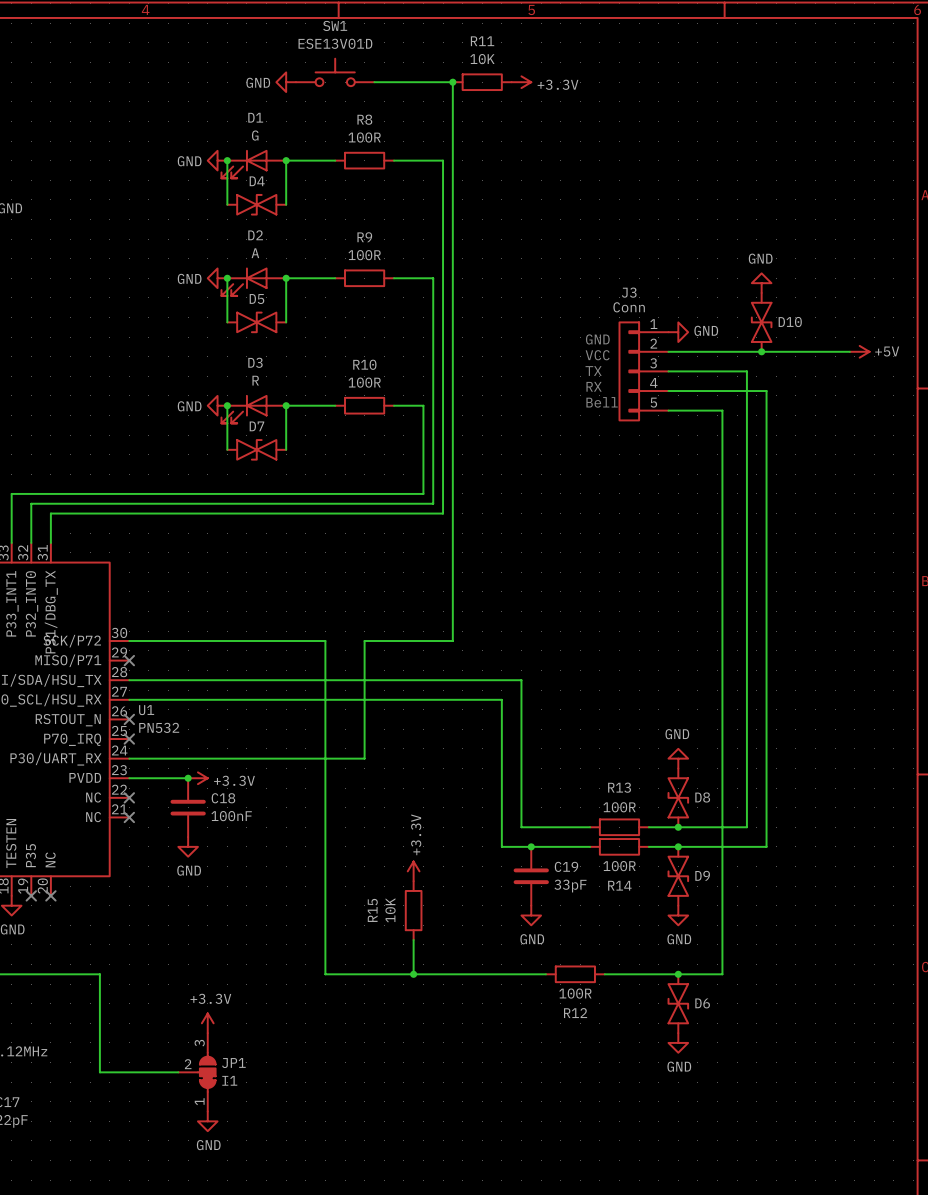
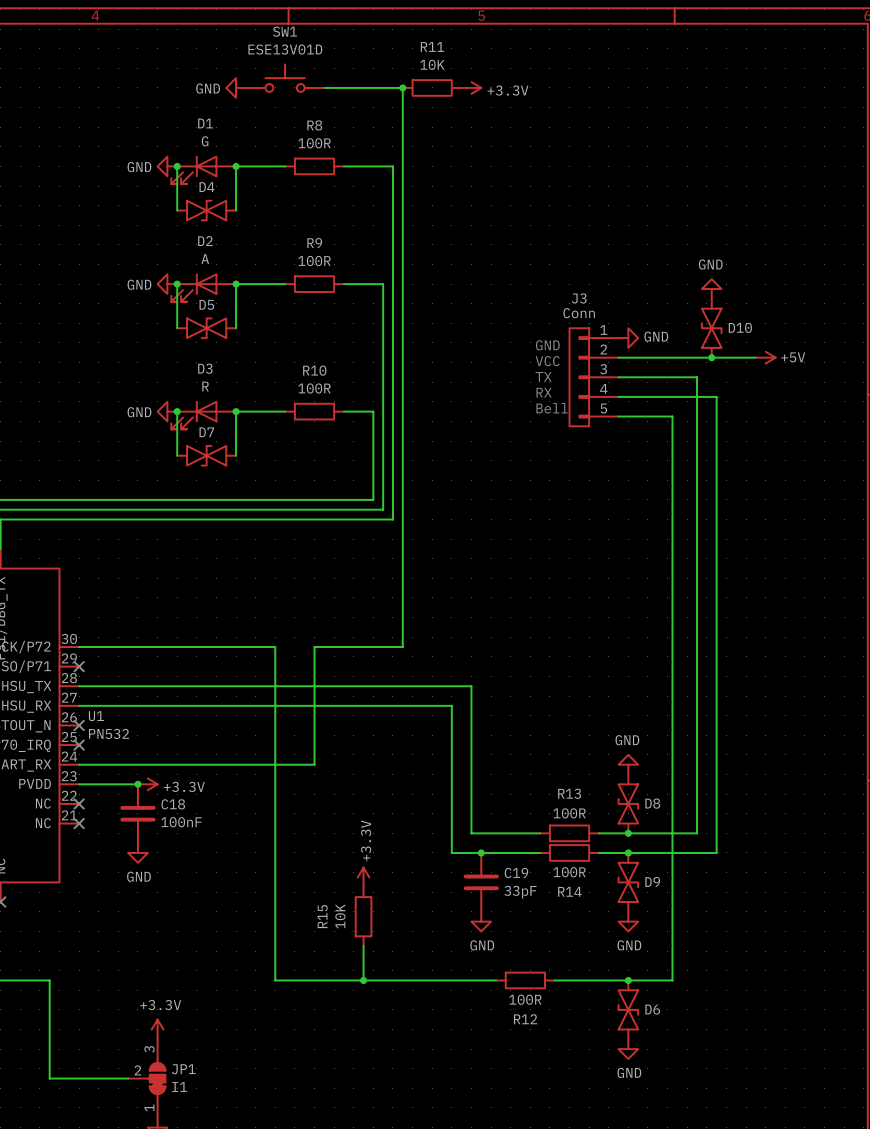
power symbol position: +5V (859, 351) -> +5V (765, 357)

